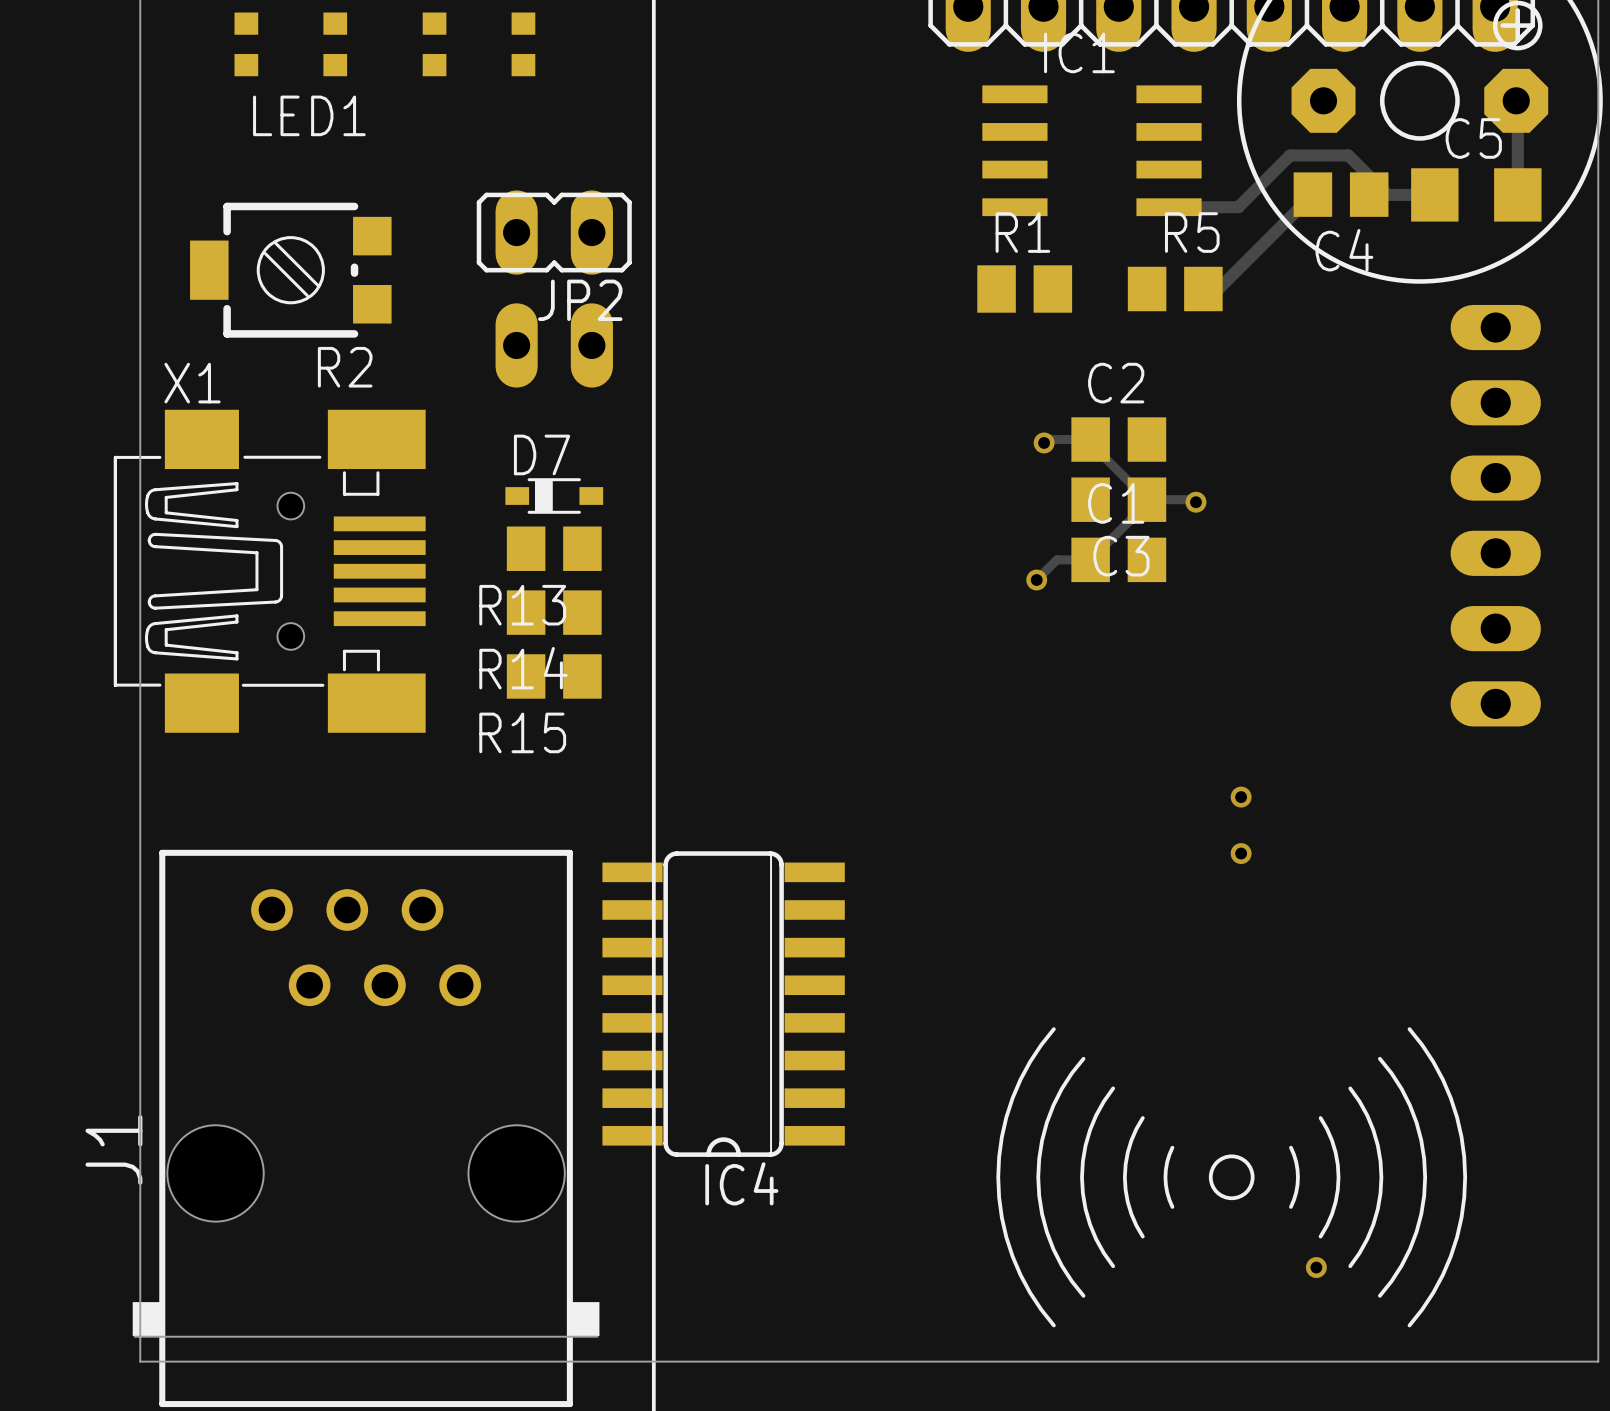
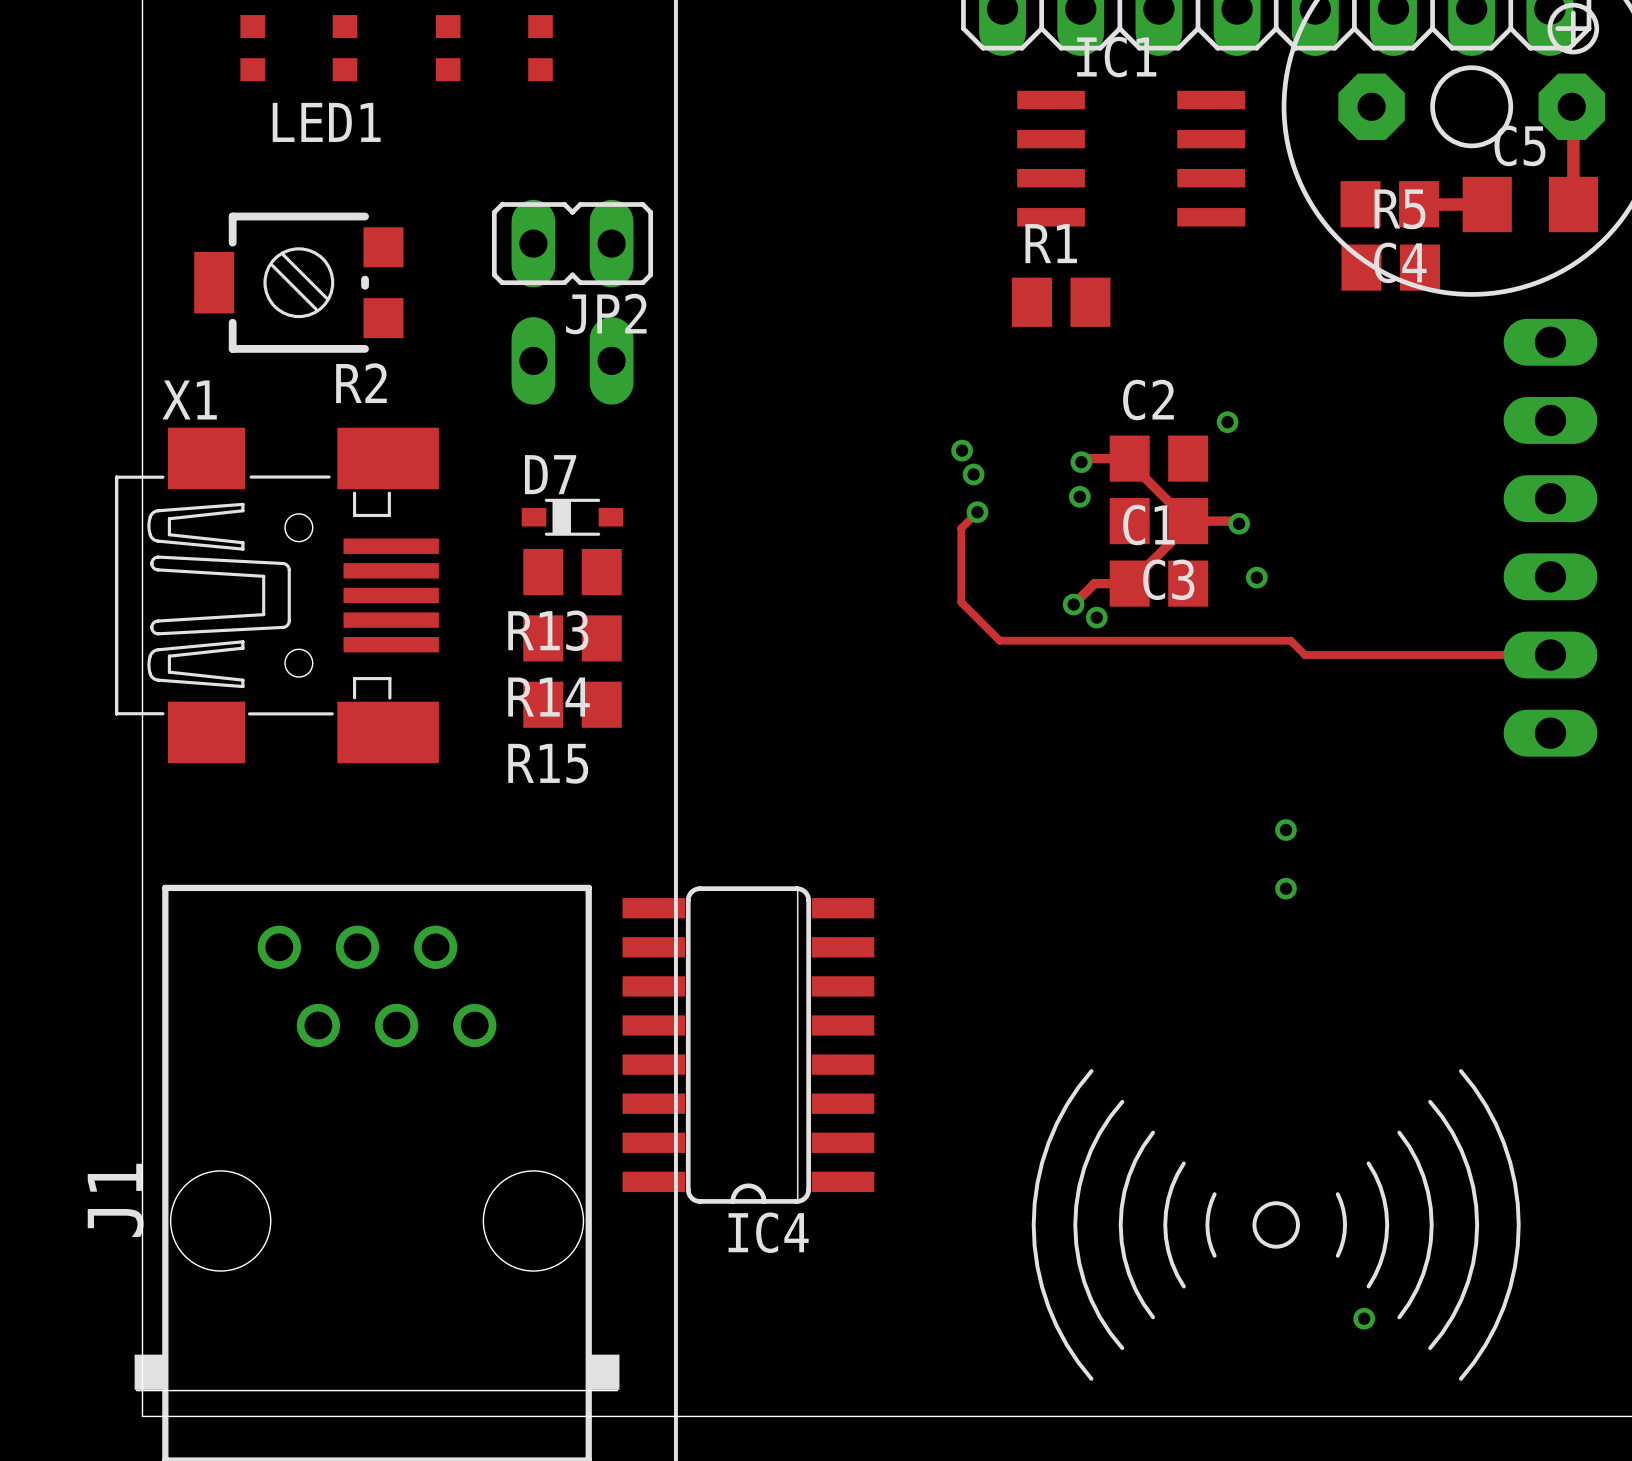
track: (1312, 194) (1218, 289) (1203, 289) -> none
track: (1387, 194) (1348, 155) (1290, 155) (1238, 207) (1169, 207) -> none
R5 position: (1175, 289) -> (1390, 267)
via: none -> (1227, 422)
via: none -> (962, 450)
via: none -> (973, 474)
via: none -> (1079, 496)
track: none -> (977, 512) (961, 528) (961, 602) (999, 640) (1290, 640) (1304, 655) (1550, 655)
via: none -> (977, 512)
via: none -> (1256, 577)
via: none -> (1096, 617)

